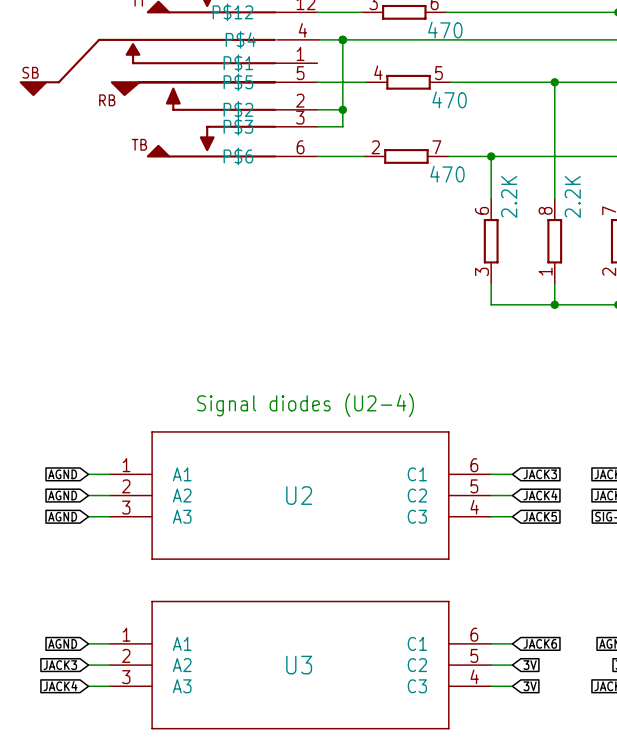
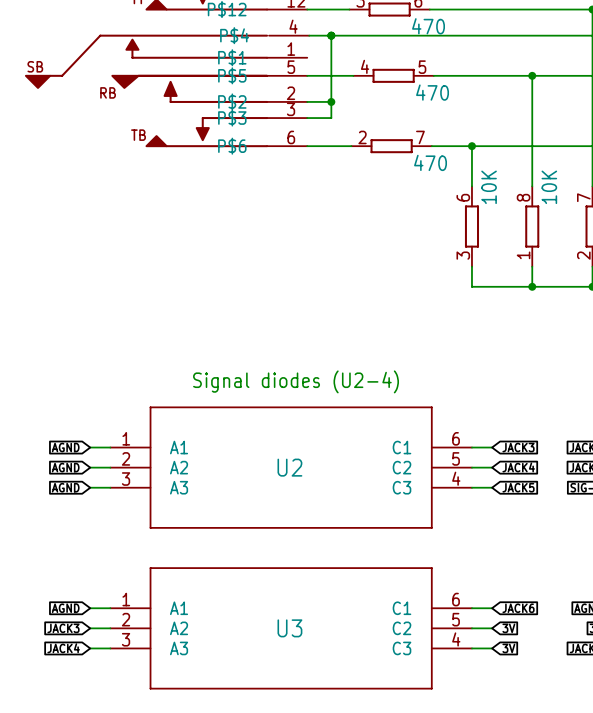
part value: 2.2K (509, 197) -> 10K (489, 187)
part value: 2.2K (572, 197) -> 10K (549, 187)

